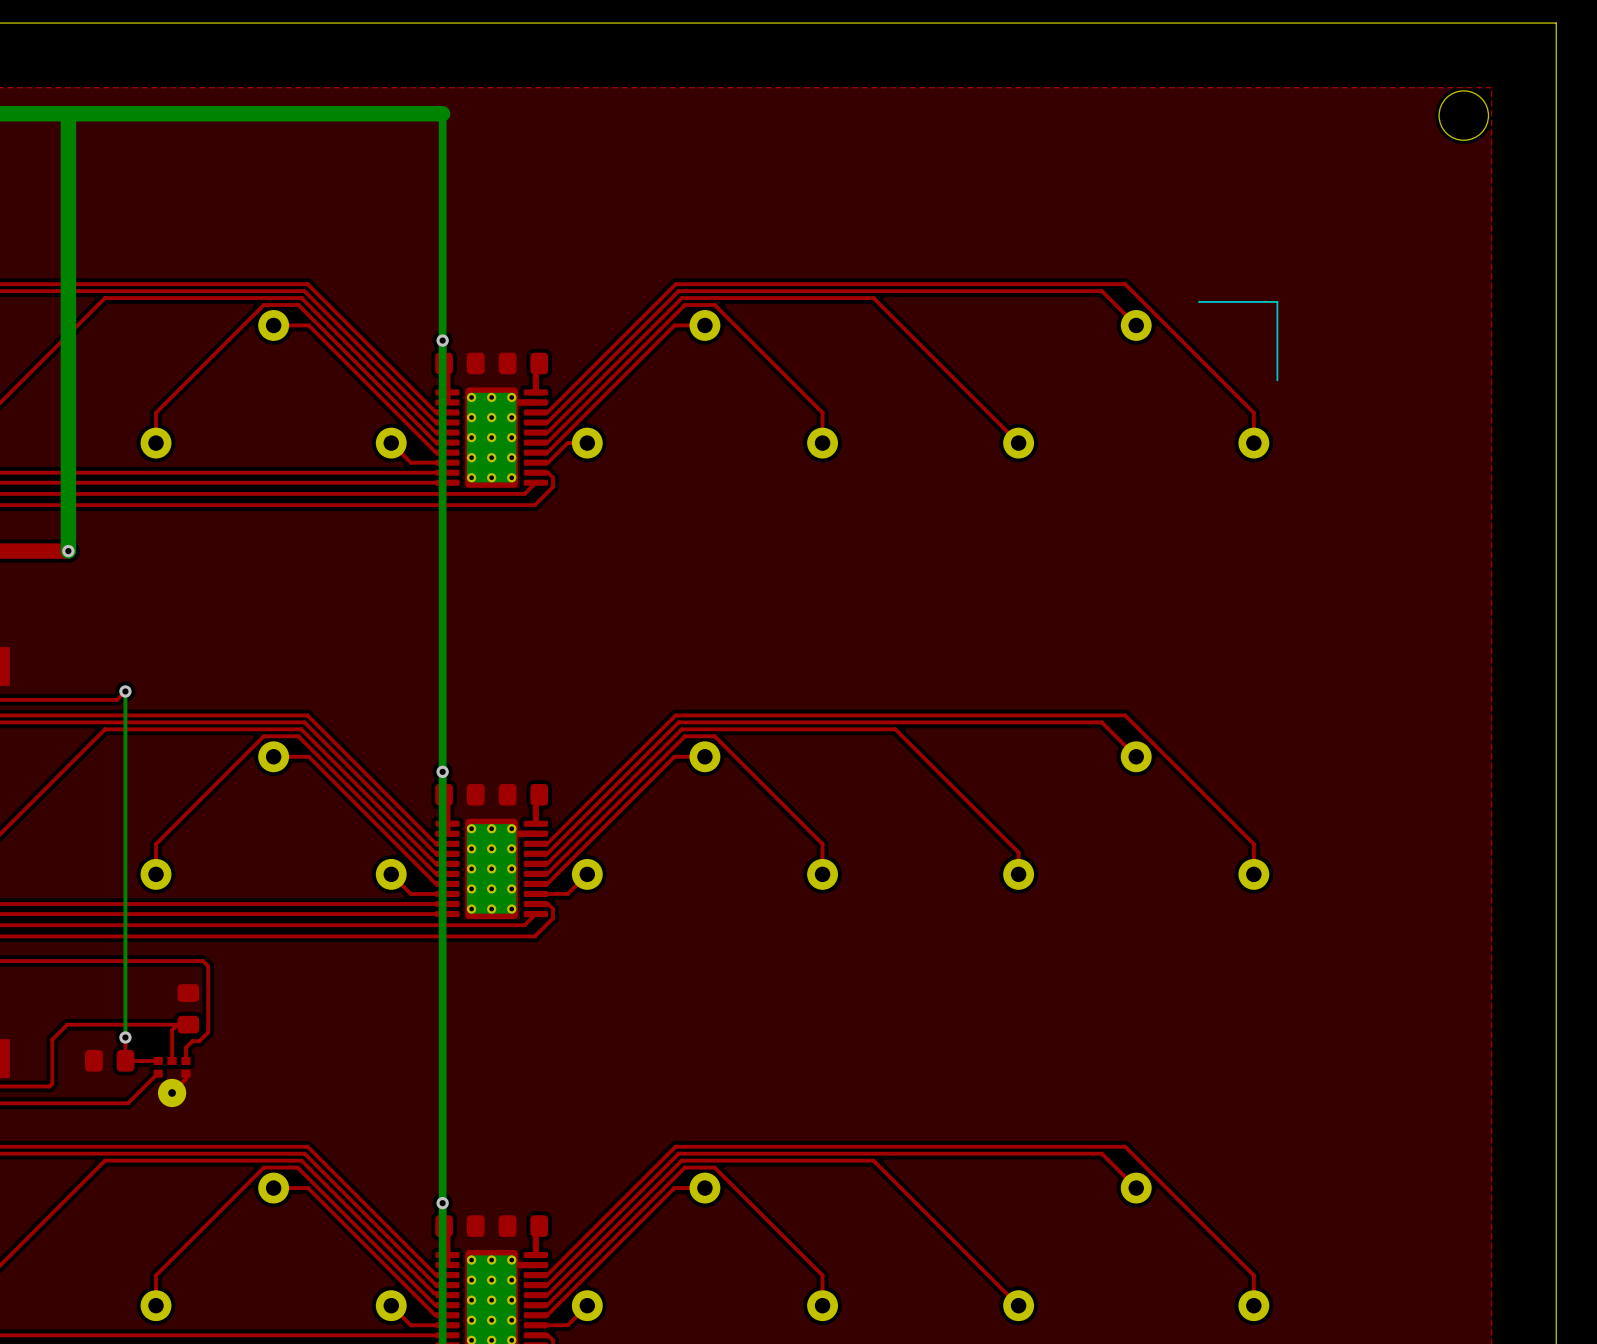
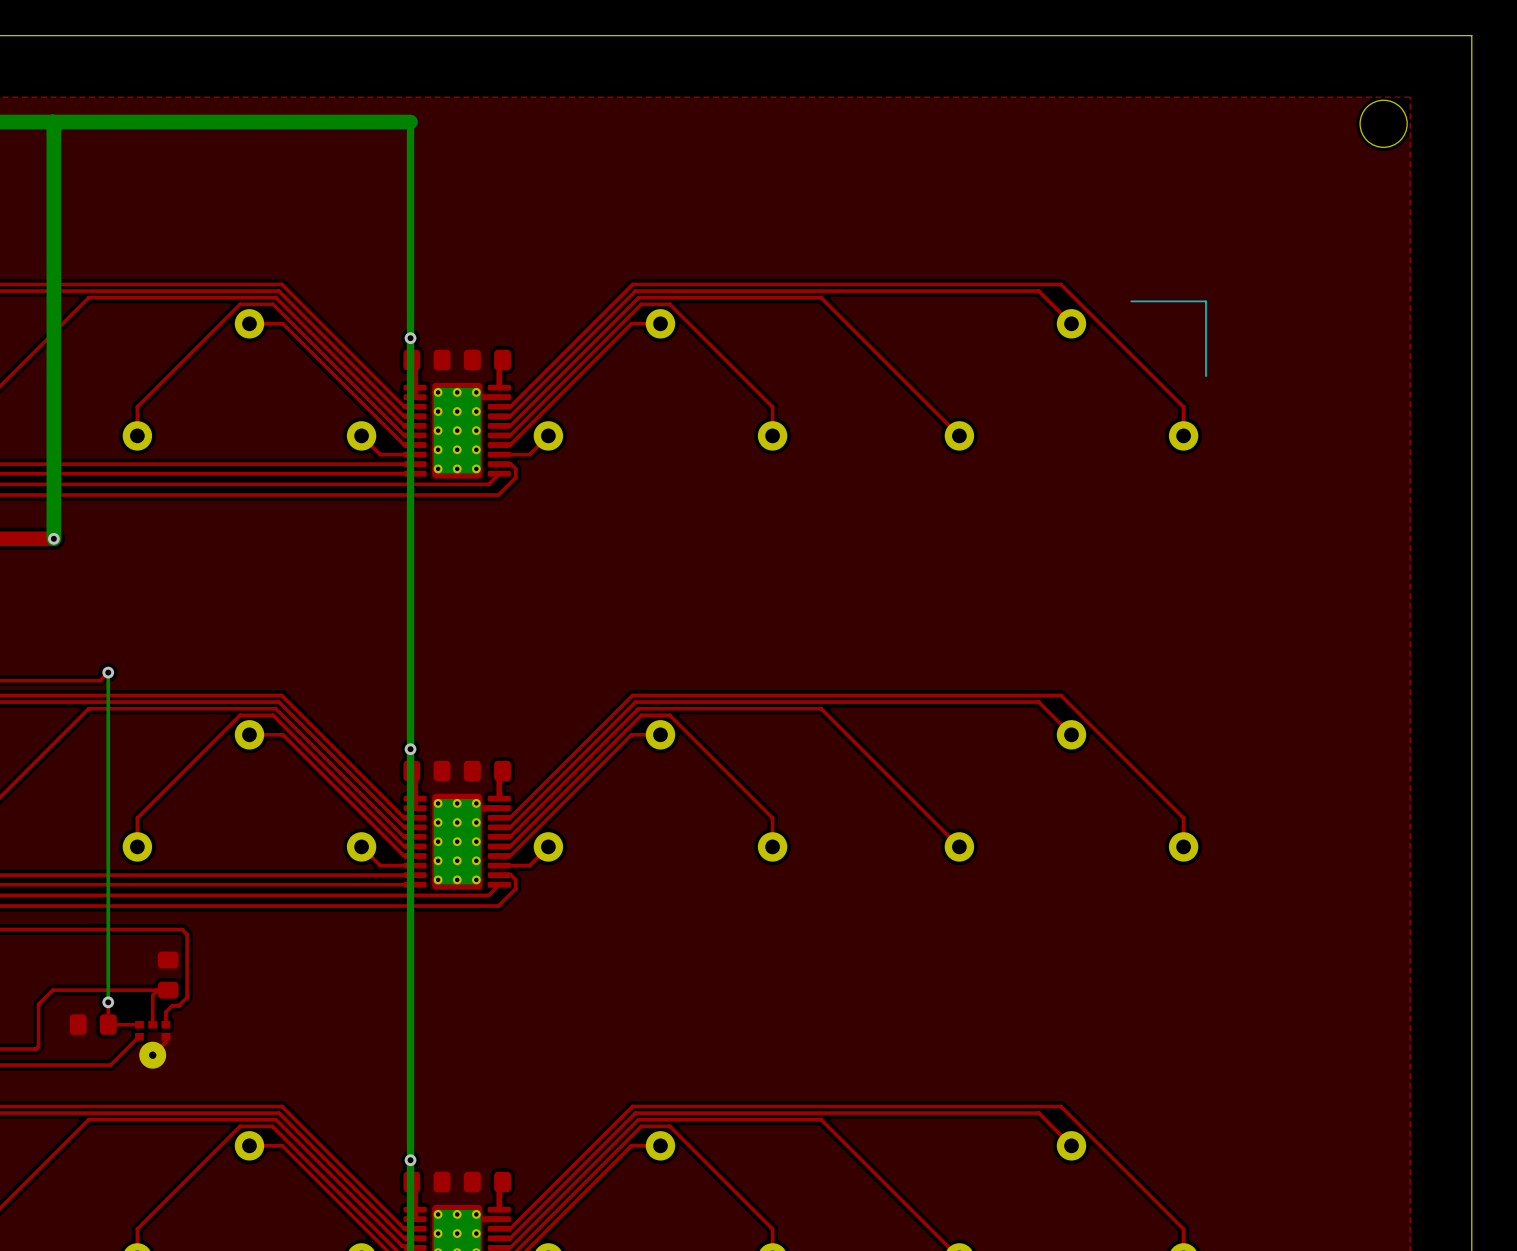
top track: (587, 443) (567, 443) (547, 462) -> (548, 435) (529, 454) (510, 454)
top track: (873, 729) (895, 729) (1018, 852) (1018, 874) -> (821, 708) (959, 846)

